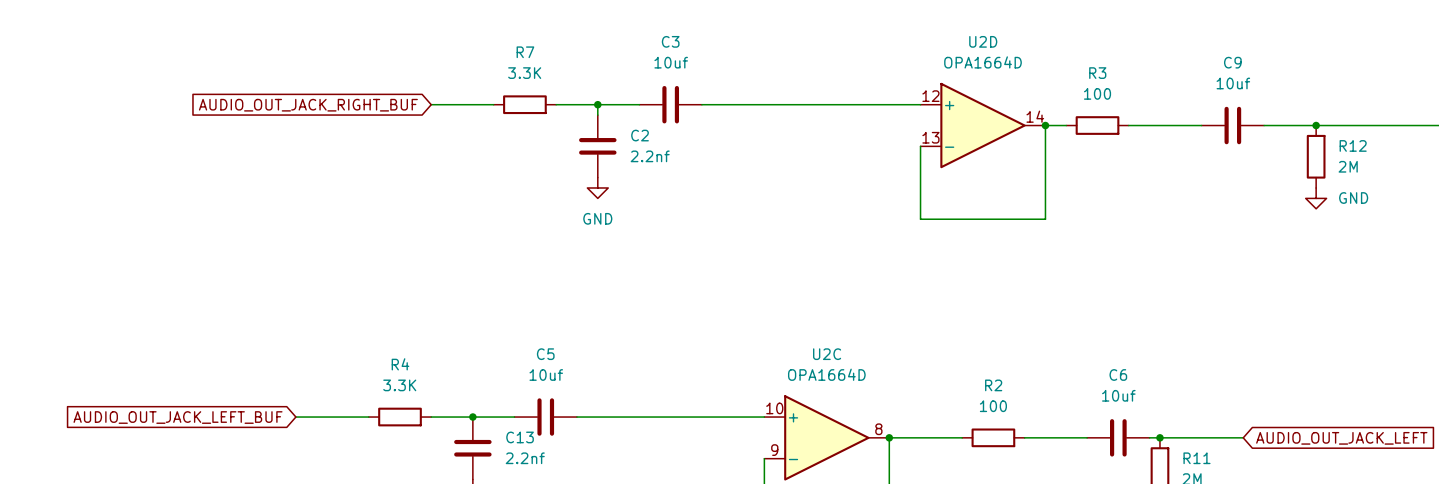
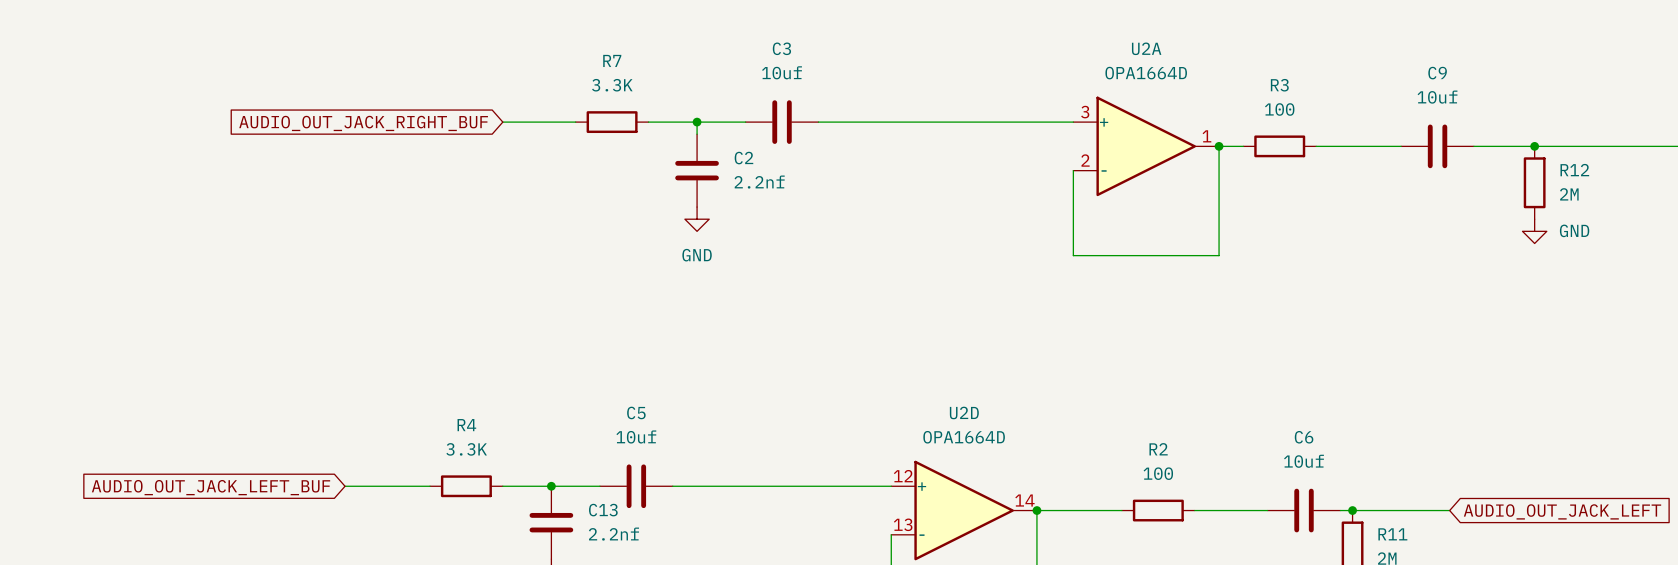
U2D position: (982, 125) -> (964, 510)
U2A: none -> OPA1664D (1146, 146)
U2C: OPA1664D (826, 437) -> none

